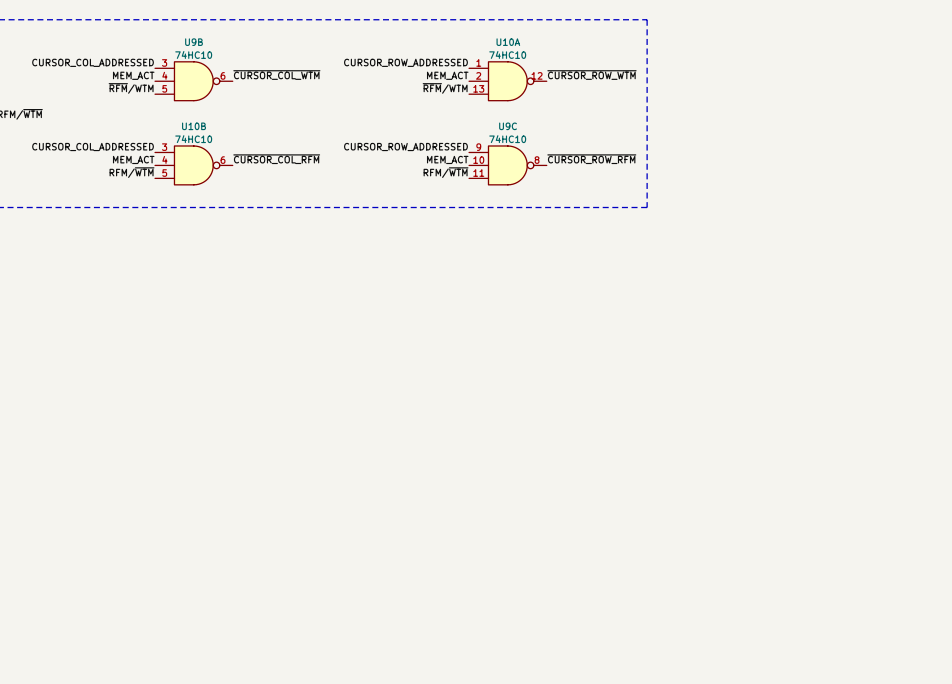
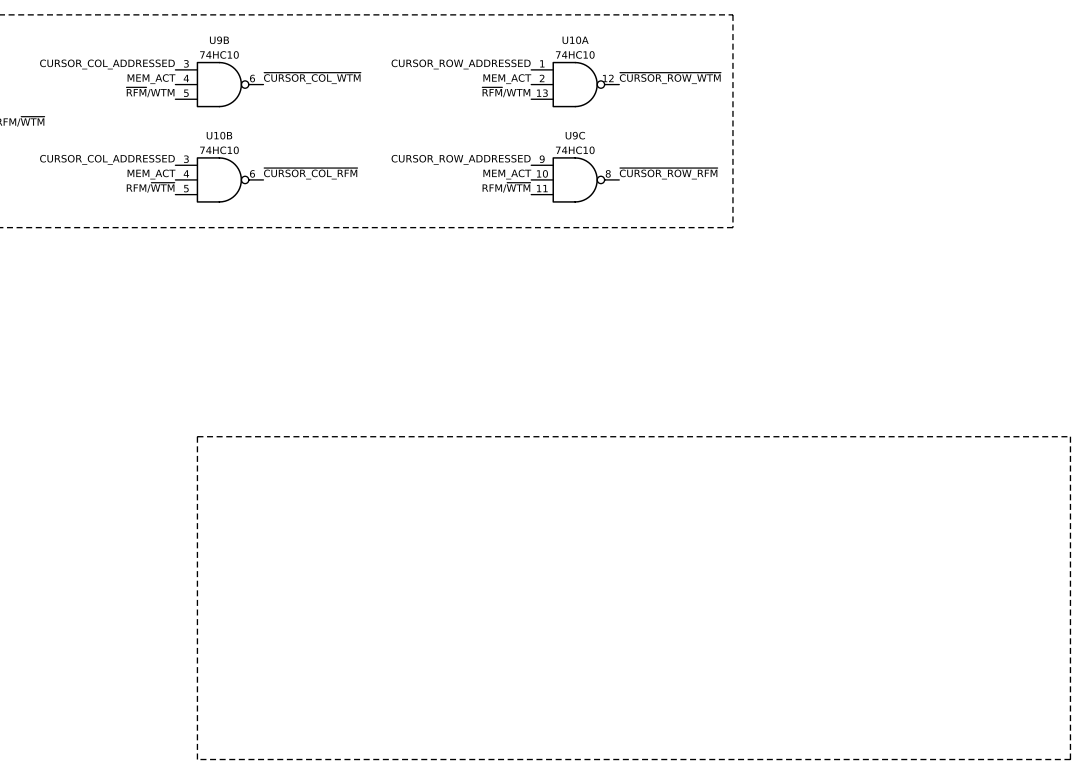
line: none -> (197, 436) (1070, 436) (1070, 759) (197, 759) (197, 436)

